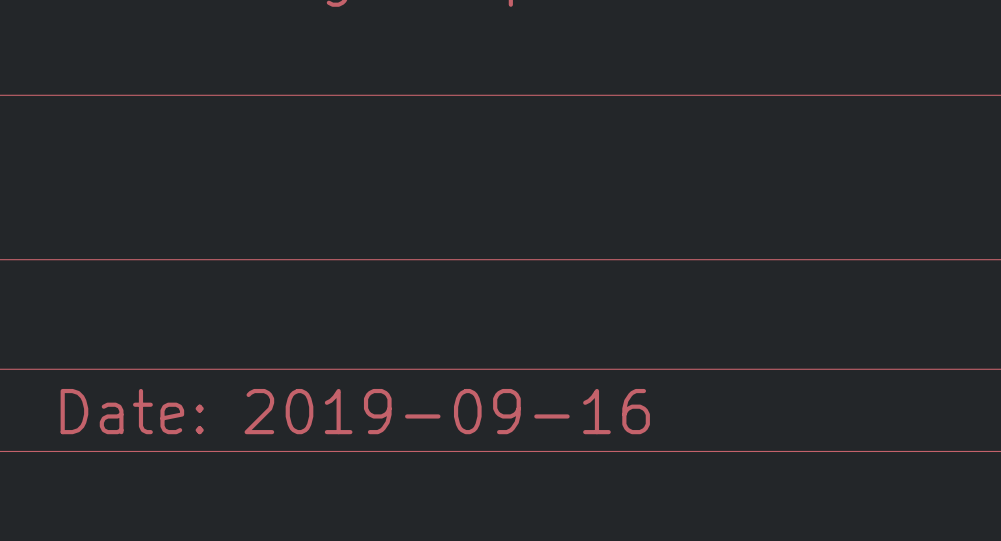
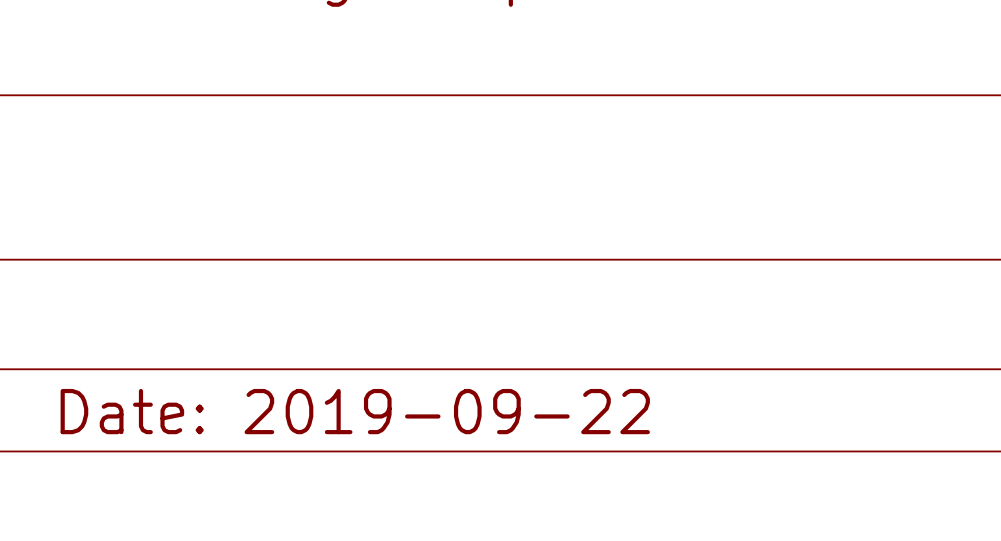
title block: Date: 2019-09-16 (355, 411) -> Date: 2019-09-22 (355, 411)

